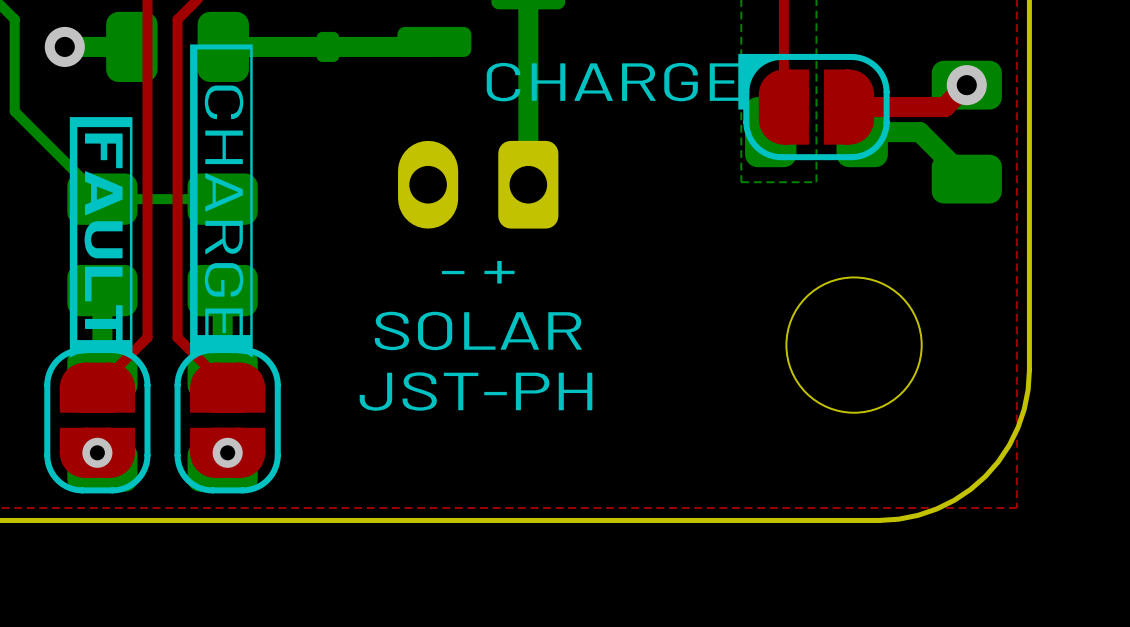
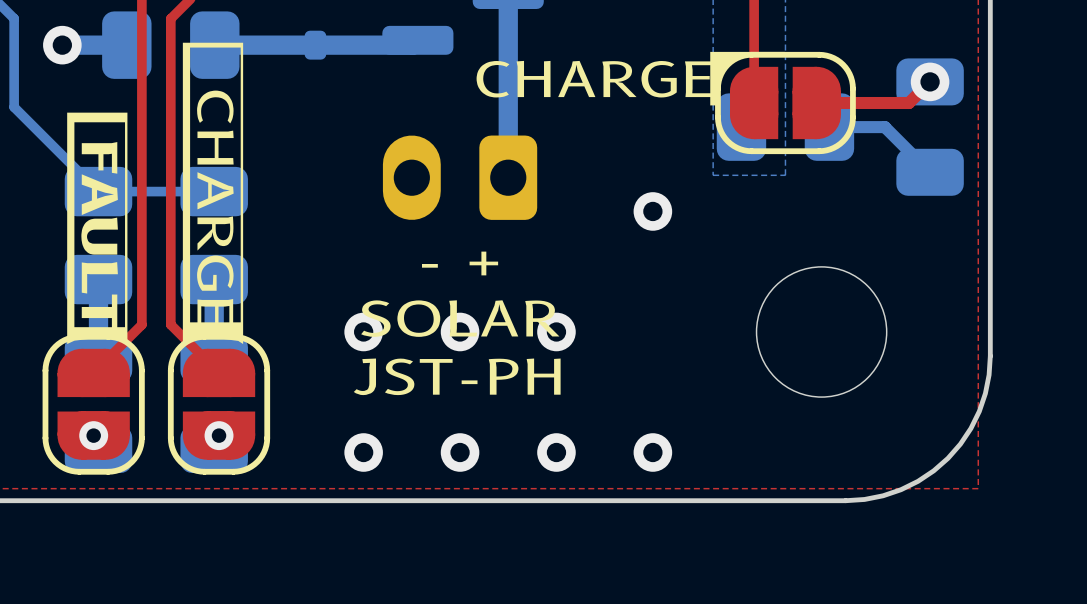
top track width: thick (966, 85) (944, 107) (849, 107) -> thin (930, 81) (908, 103) (816, 103)
bottom track width: thick (862, 132) (919, 132) (966, 179) -> thin (829, 127) (884, 127) (930, 172)
via: none -> (652, 211)
via: none -> (363, 331)
via: none -> (460, 331)
via: none -> (556, 331)
via: none -> (363, 452)
via: none -> (460, 452)
via: none -> (556, 452)
via: none -> (652, 452)

